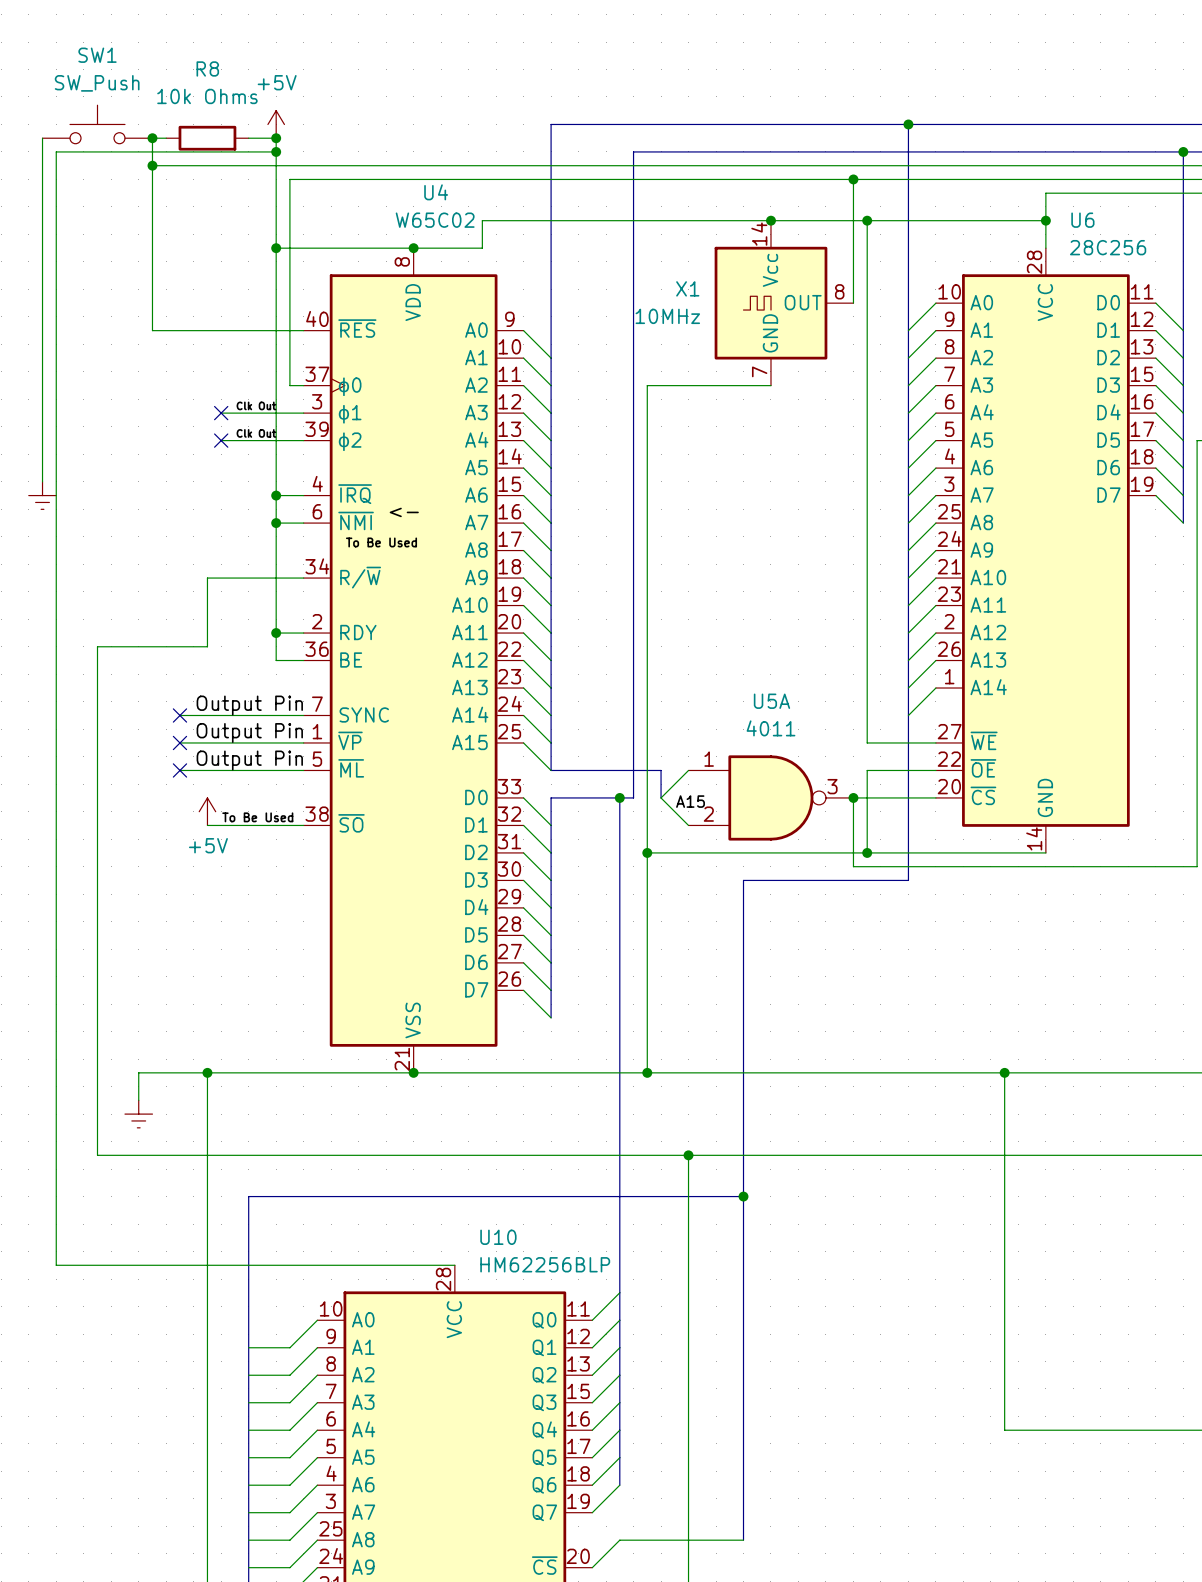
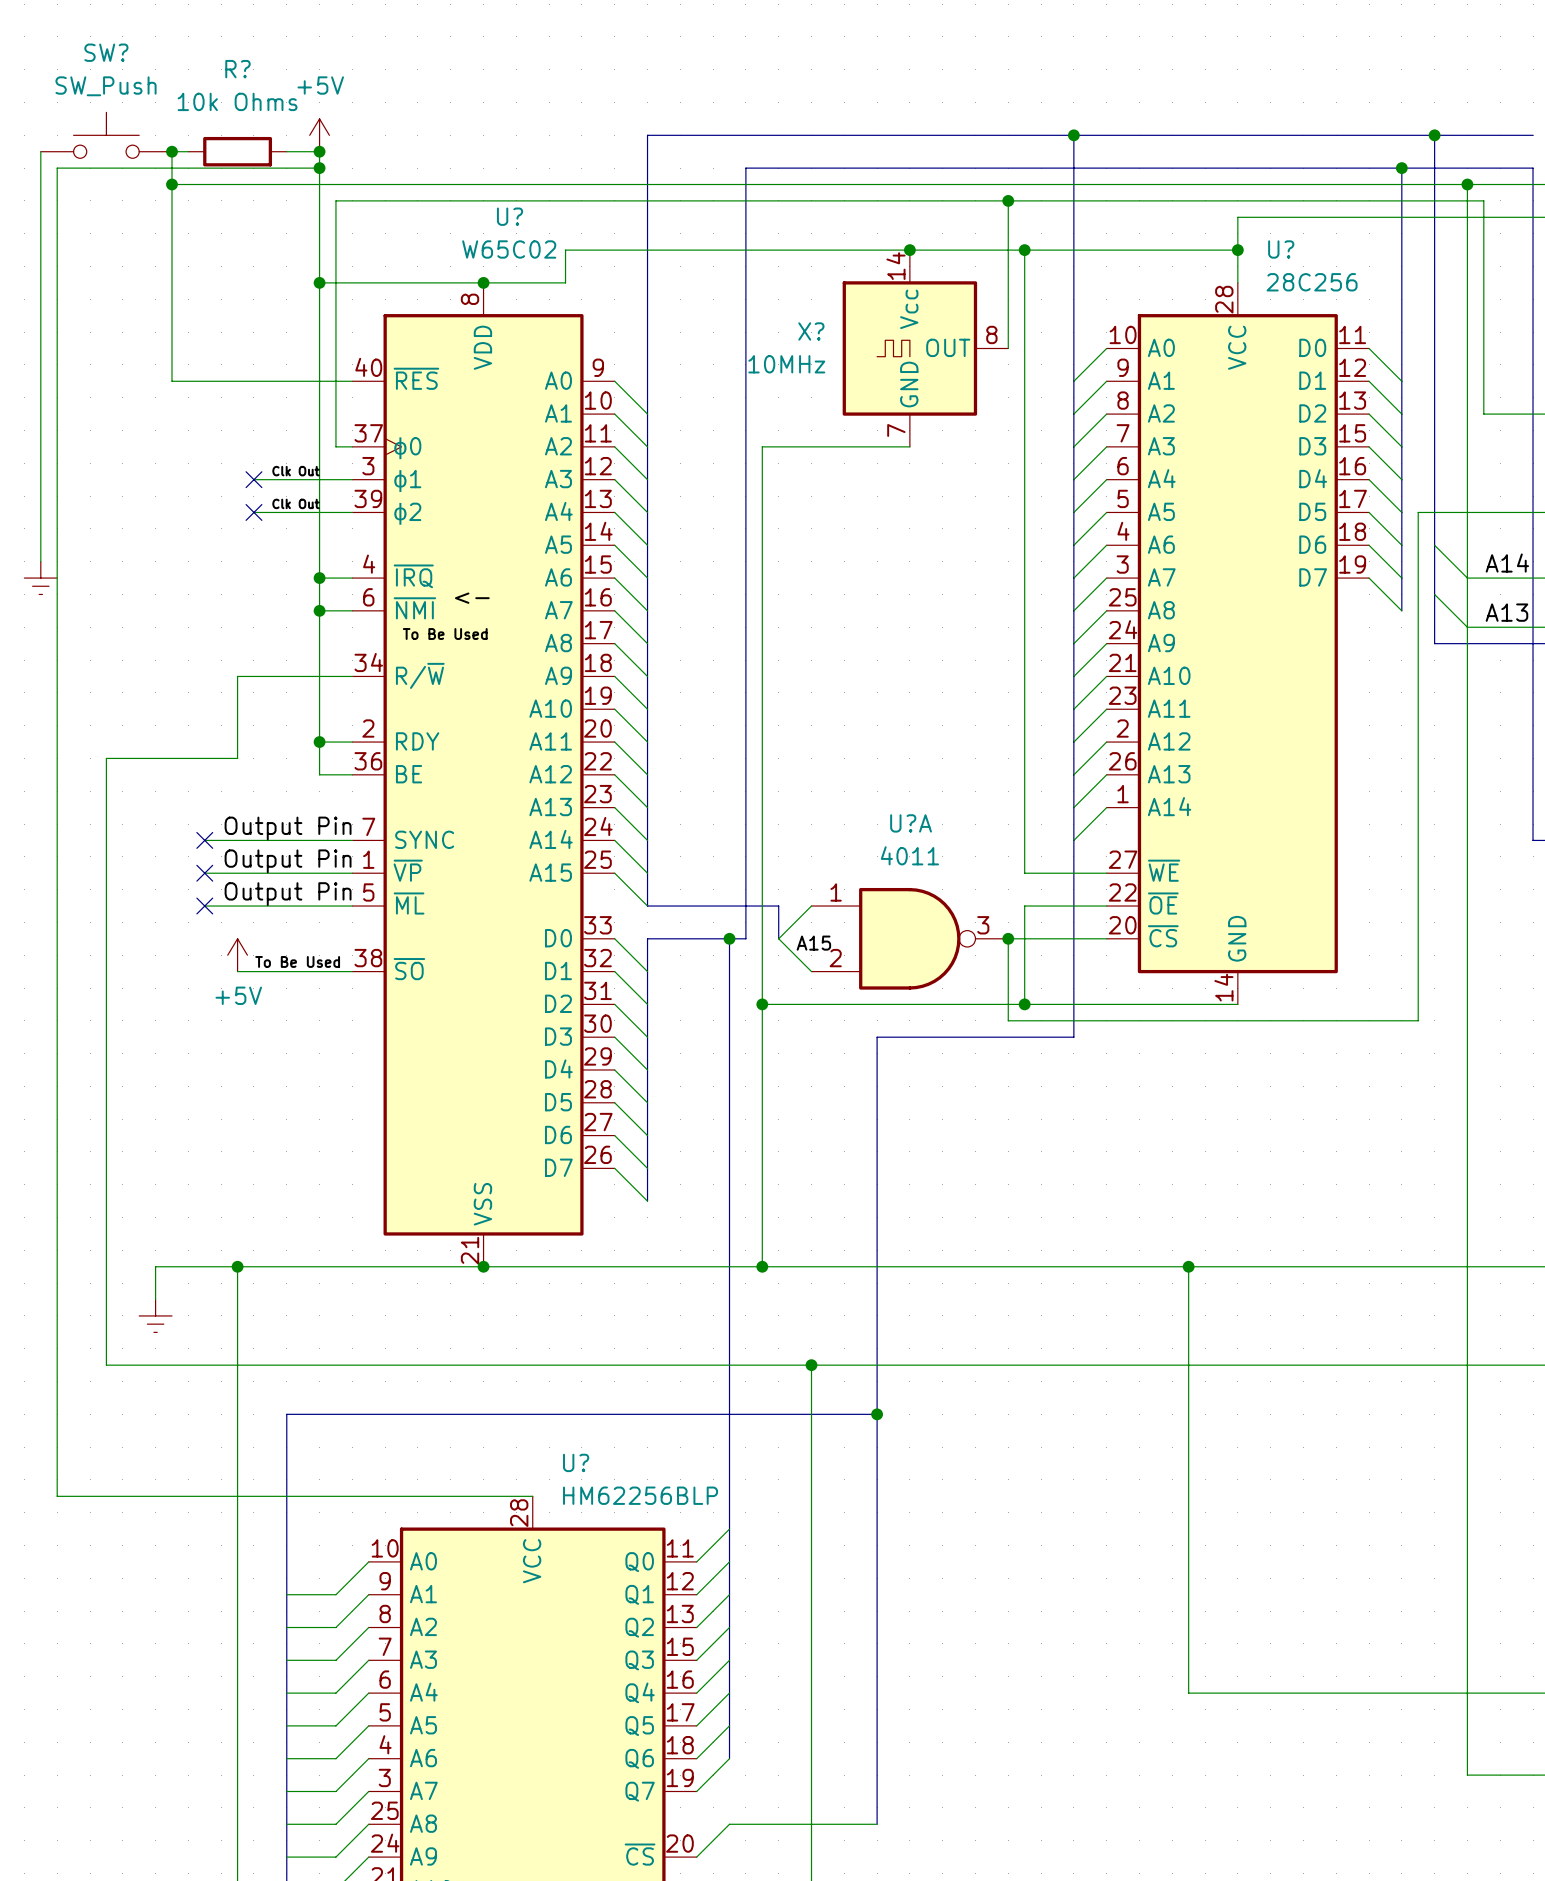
SW1 name: SW1 (97, 55) -> SW? (106, 52)
R8 name: R8 (207, 68) -> R? (237, 69)
U4 name: U4 (436, 192) -> U? (510, 216)
U6 name: U6 (1082, 220) -> U? (1281, 249)
X1 name: X1 (687, 288) -> X? (811, 331)
U5A name: U5A (771, 701) -> U?A (911, 823)
U10 name: U10 (498, 1237) -> U? (576, 1462)

